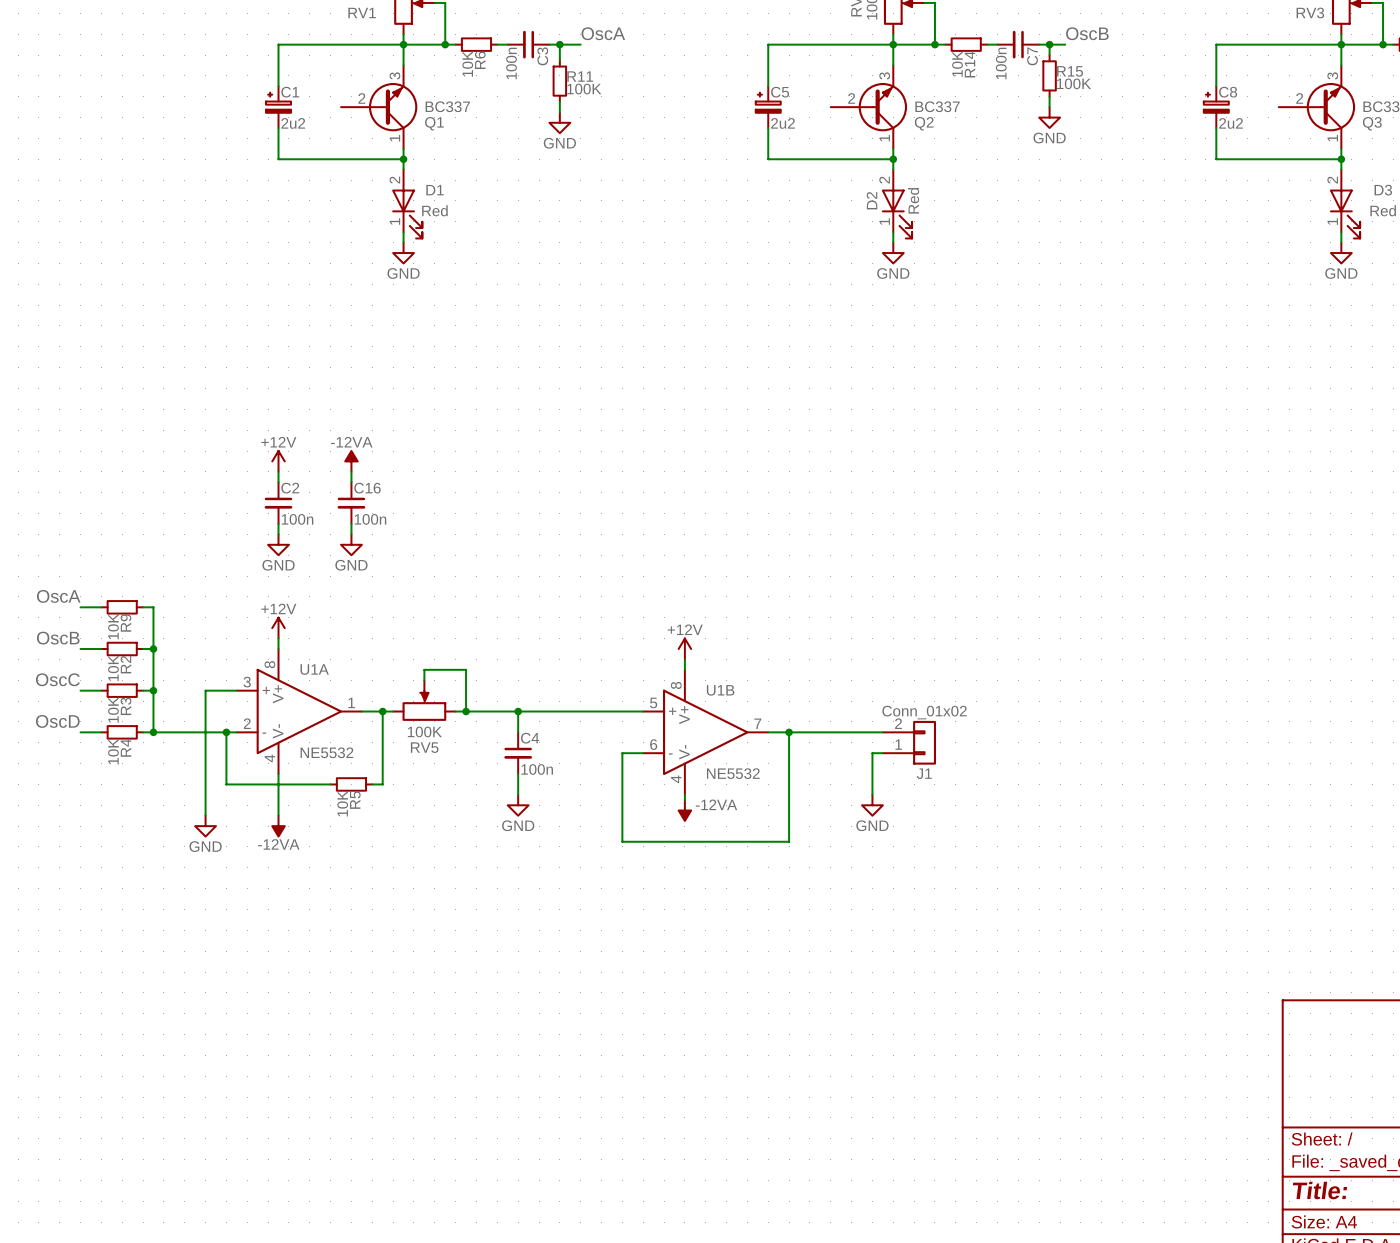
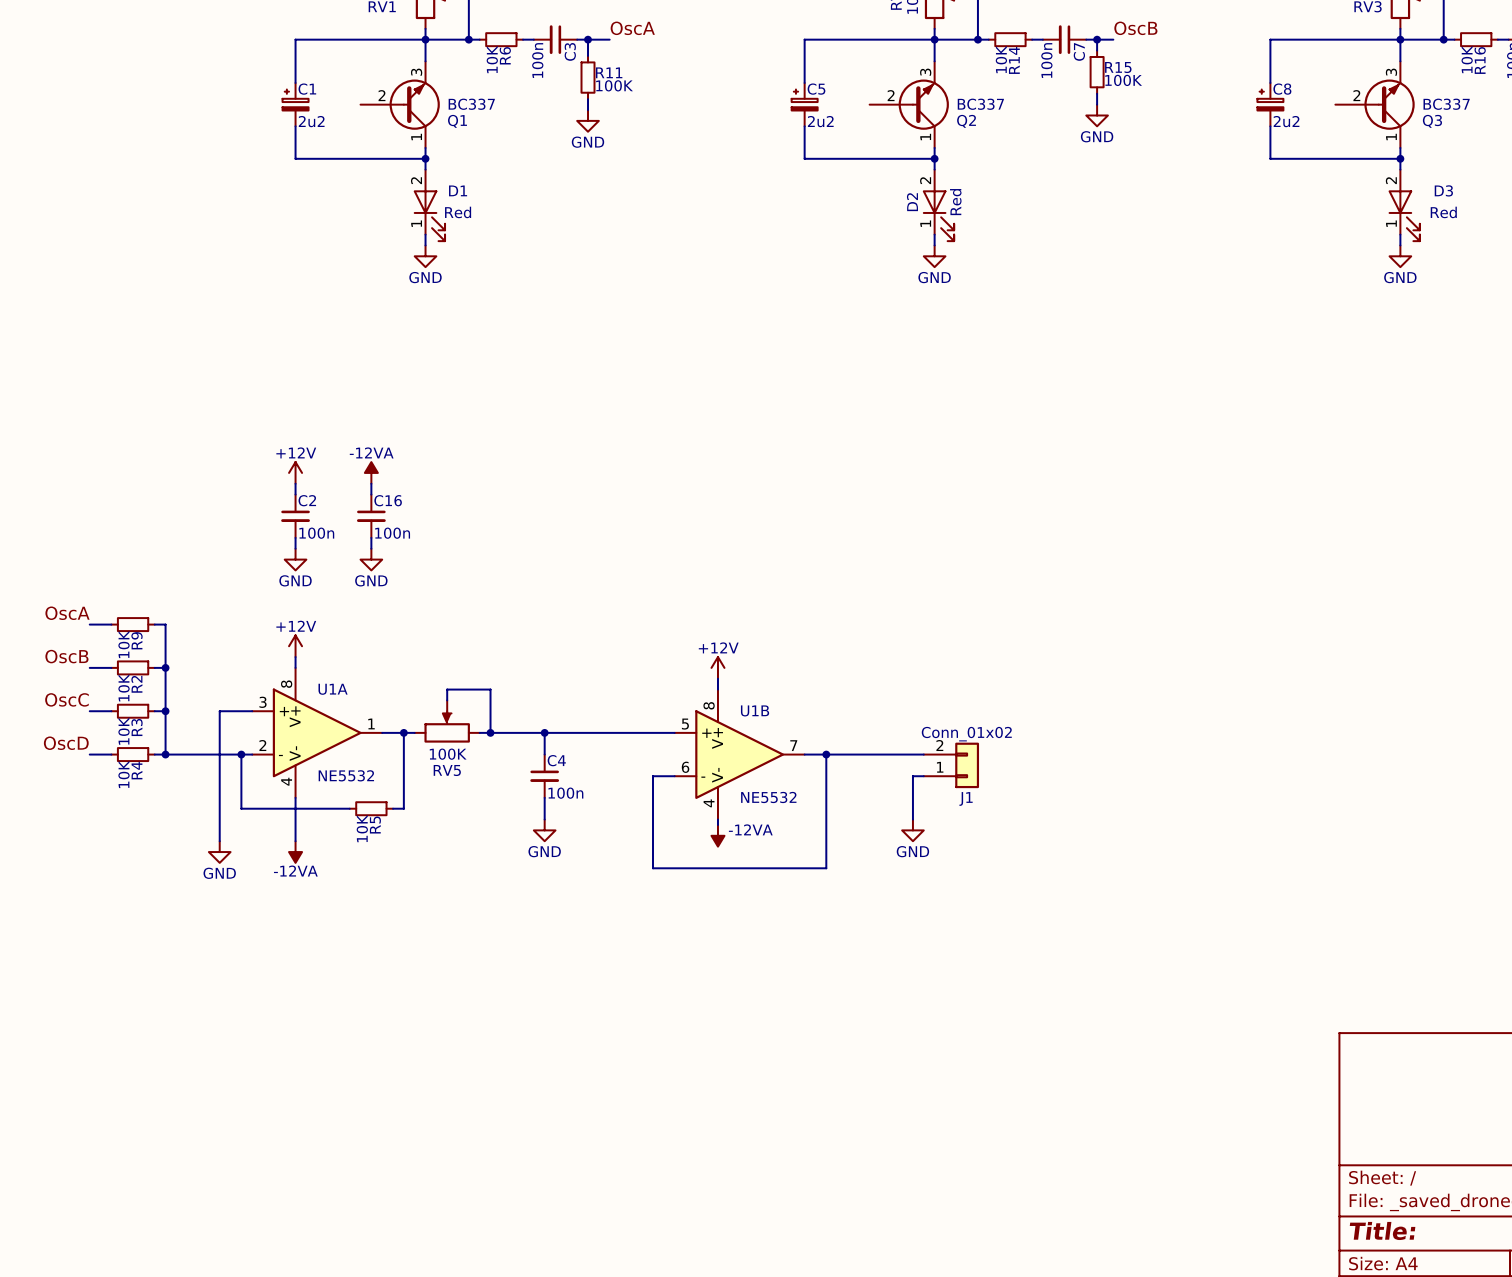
RV5 flip: as is (424, 705) -> left-right (447, 726)

